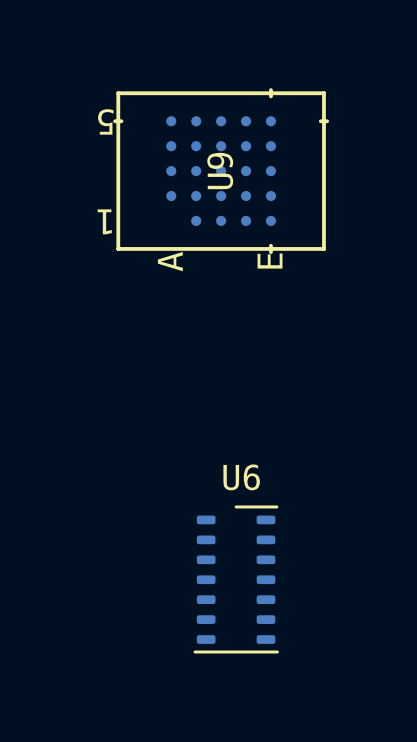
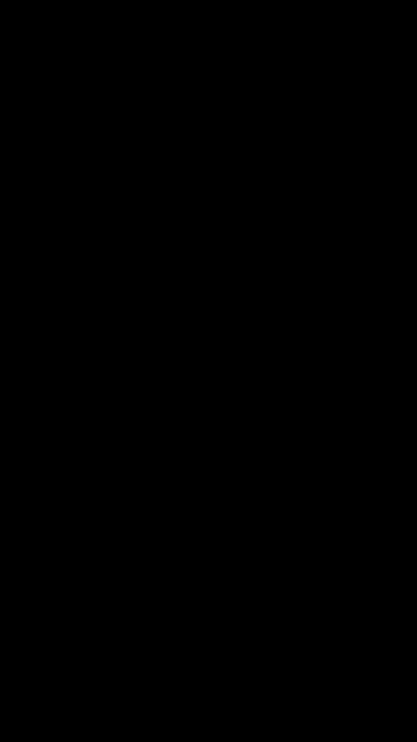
U9: (221, 171) -> none
U6: (236, 579) -> none

